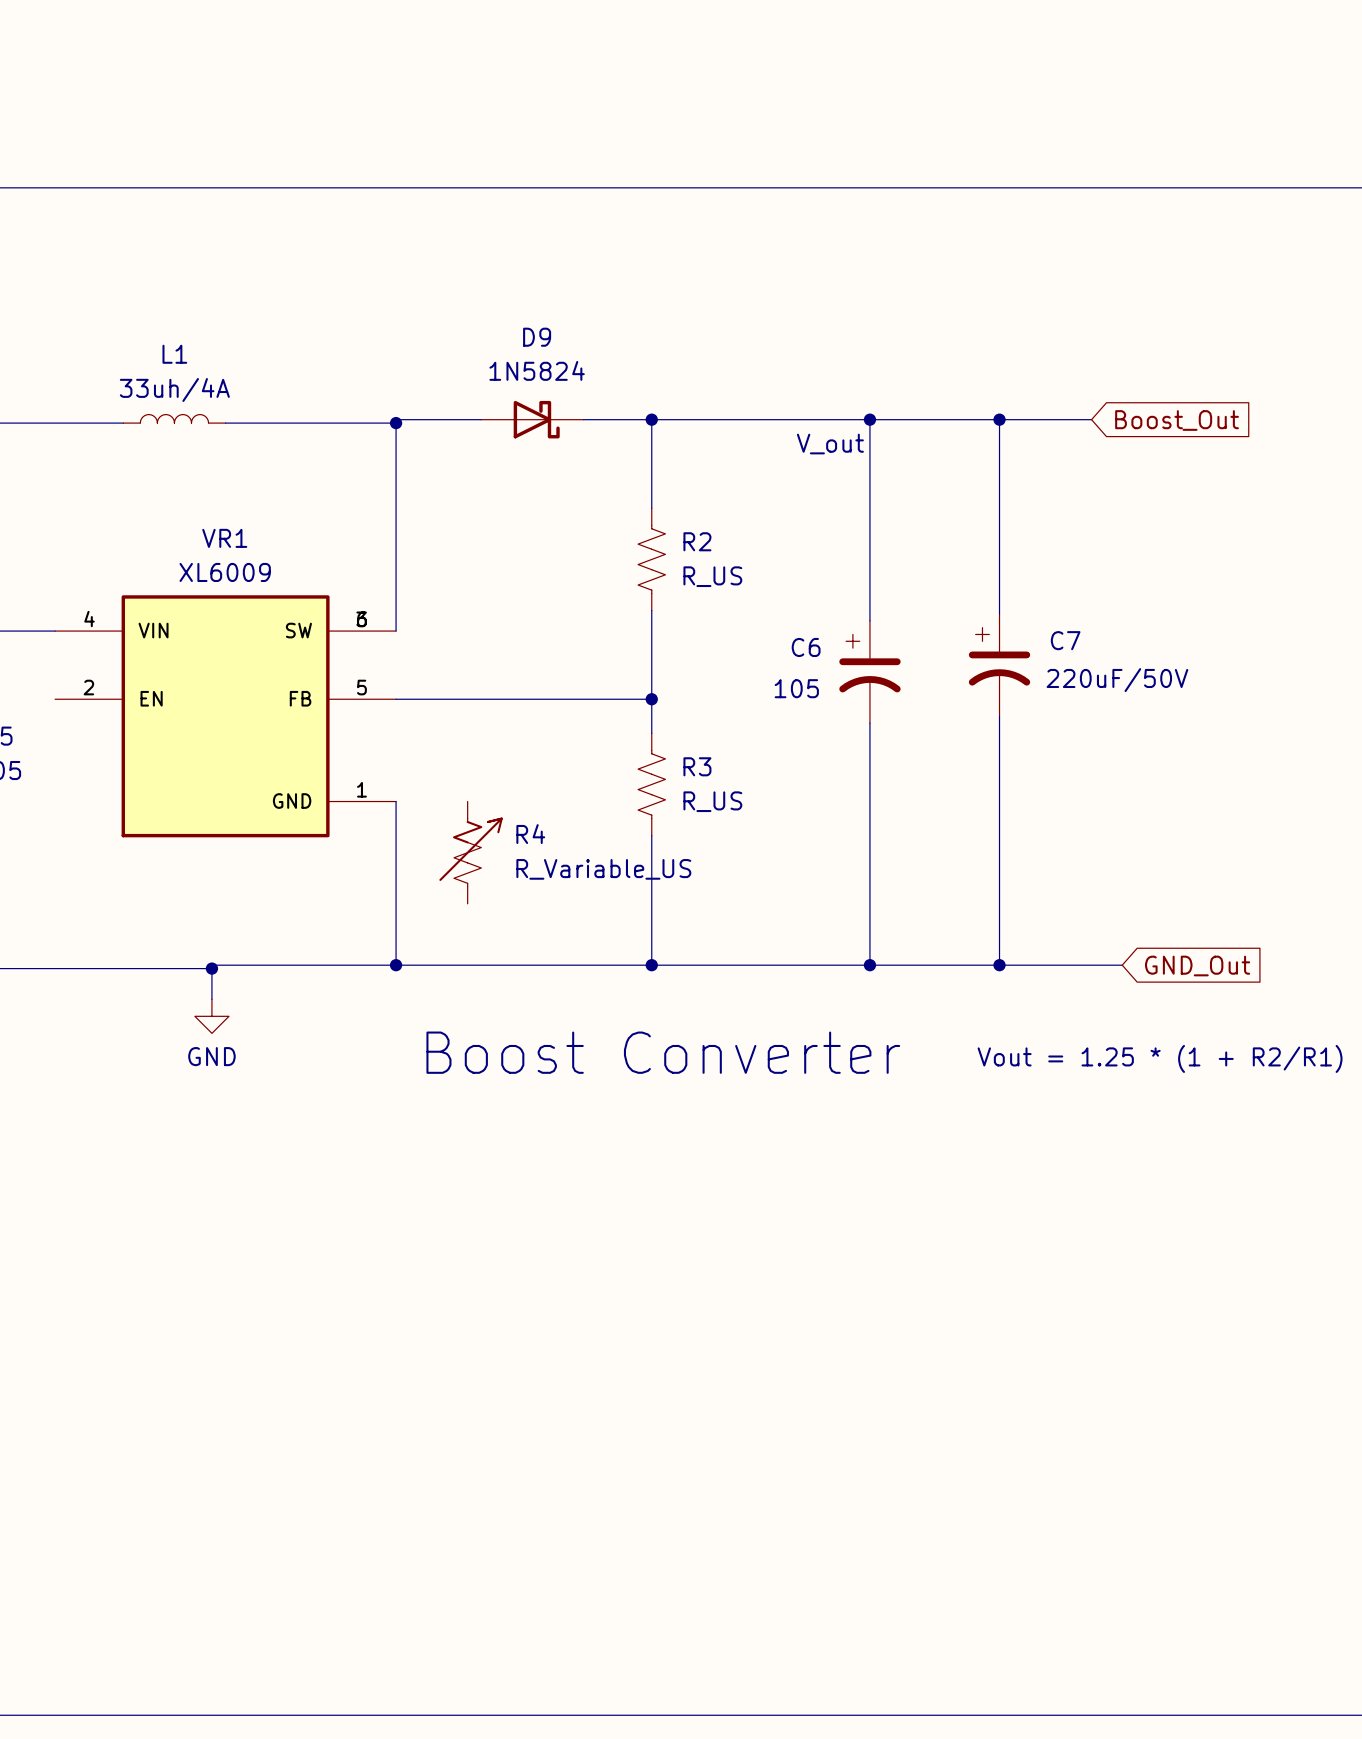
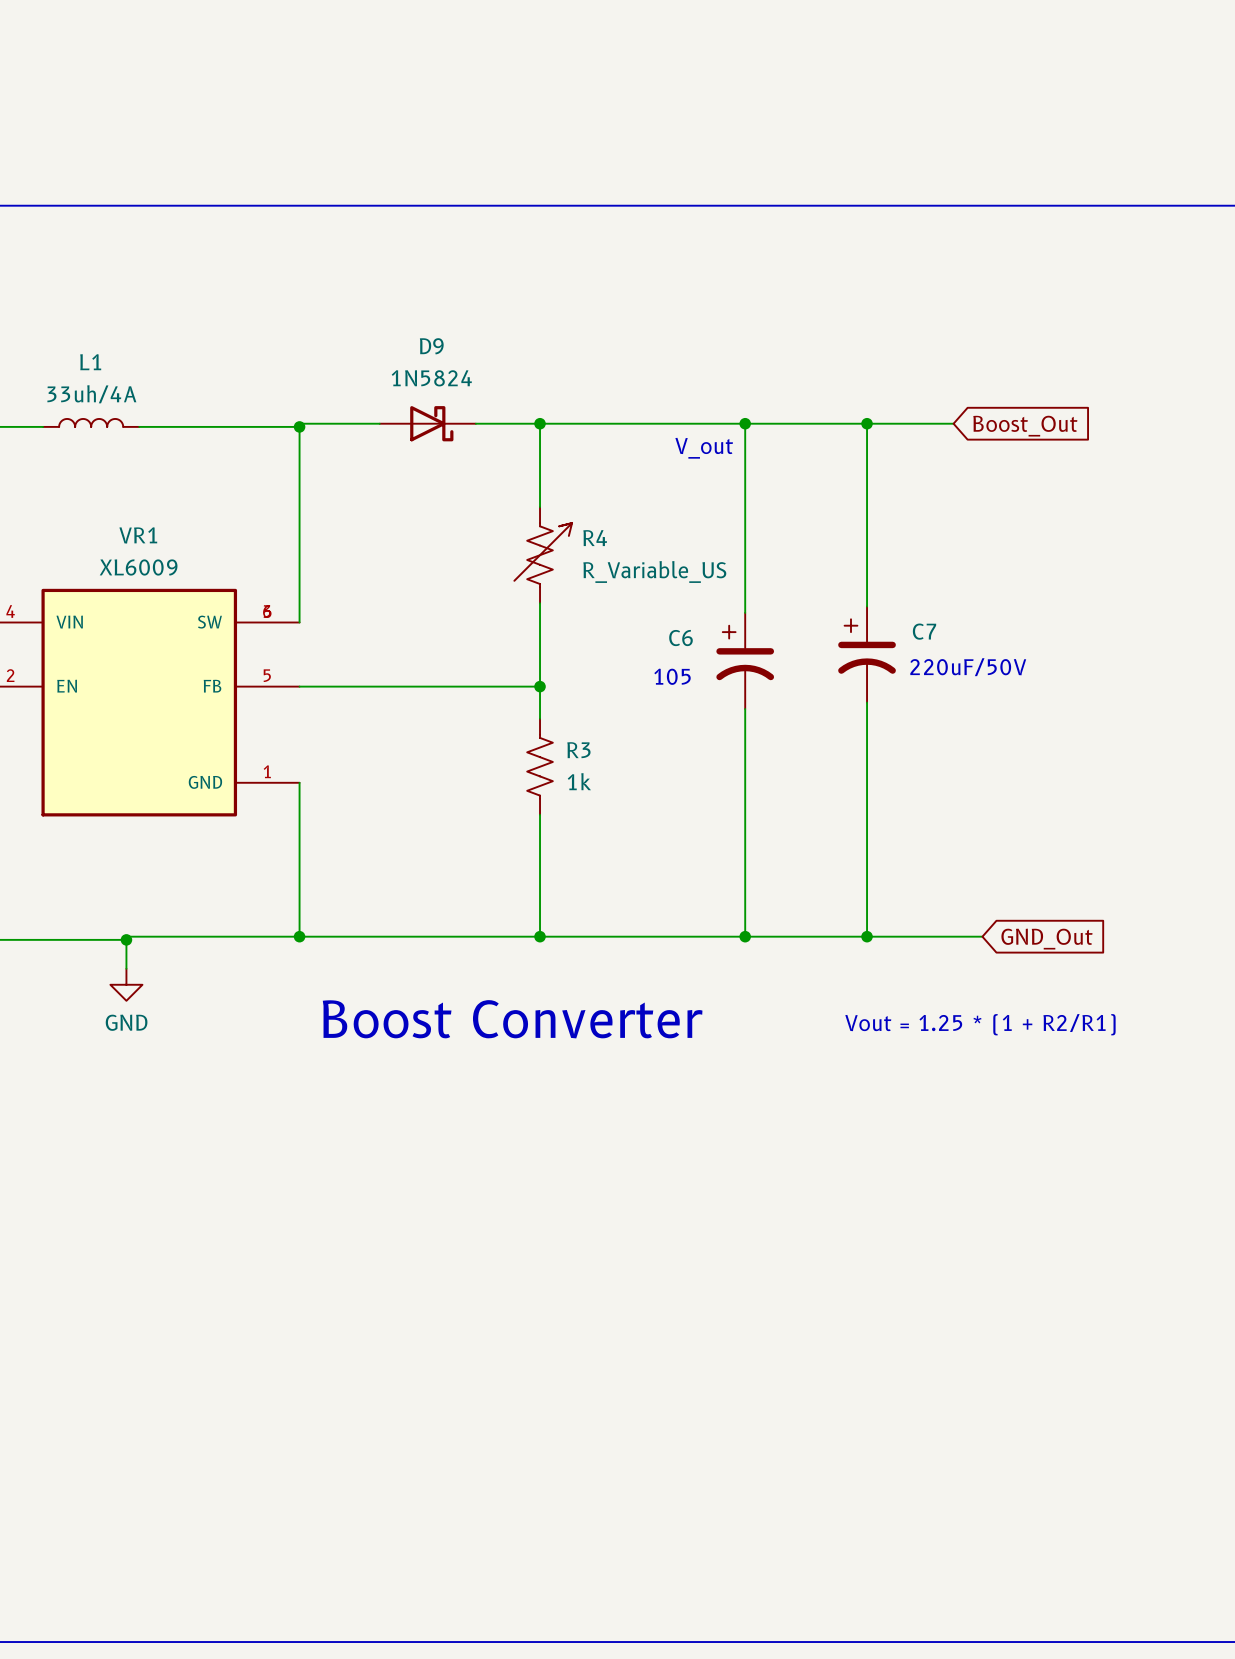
R2: R_US (651, 559) -> none
R3 value: R_US (712, 801) -> 1k (579, 781)
R4 position: (471, 852) -> (543, 555)

